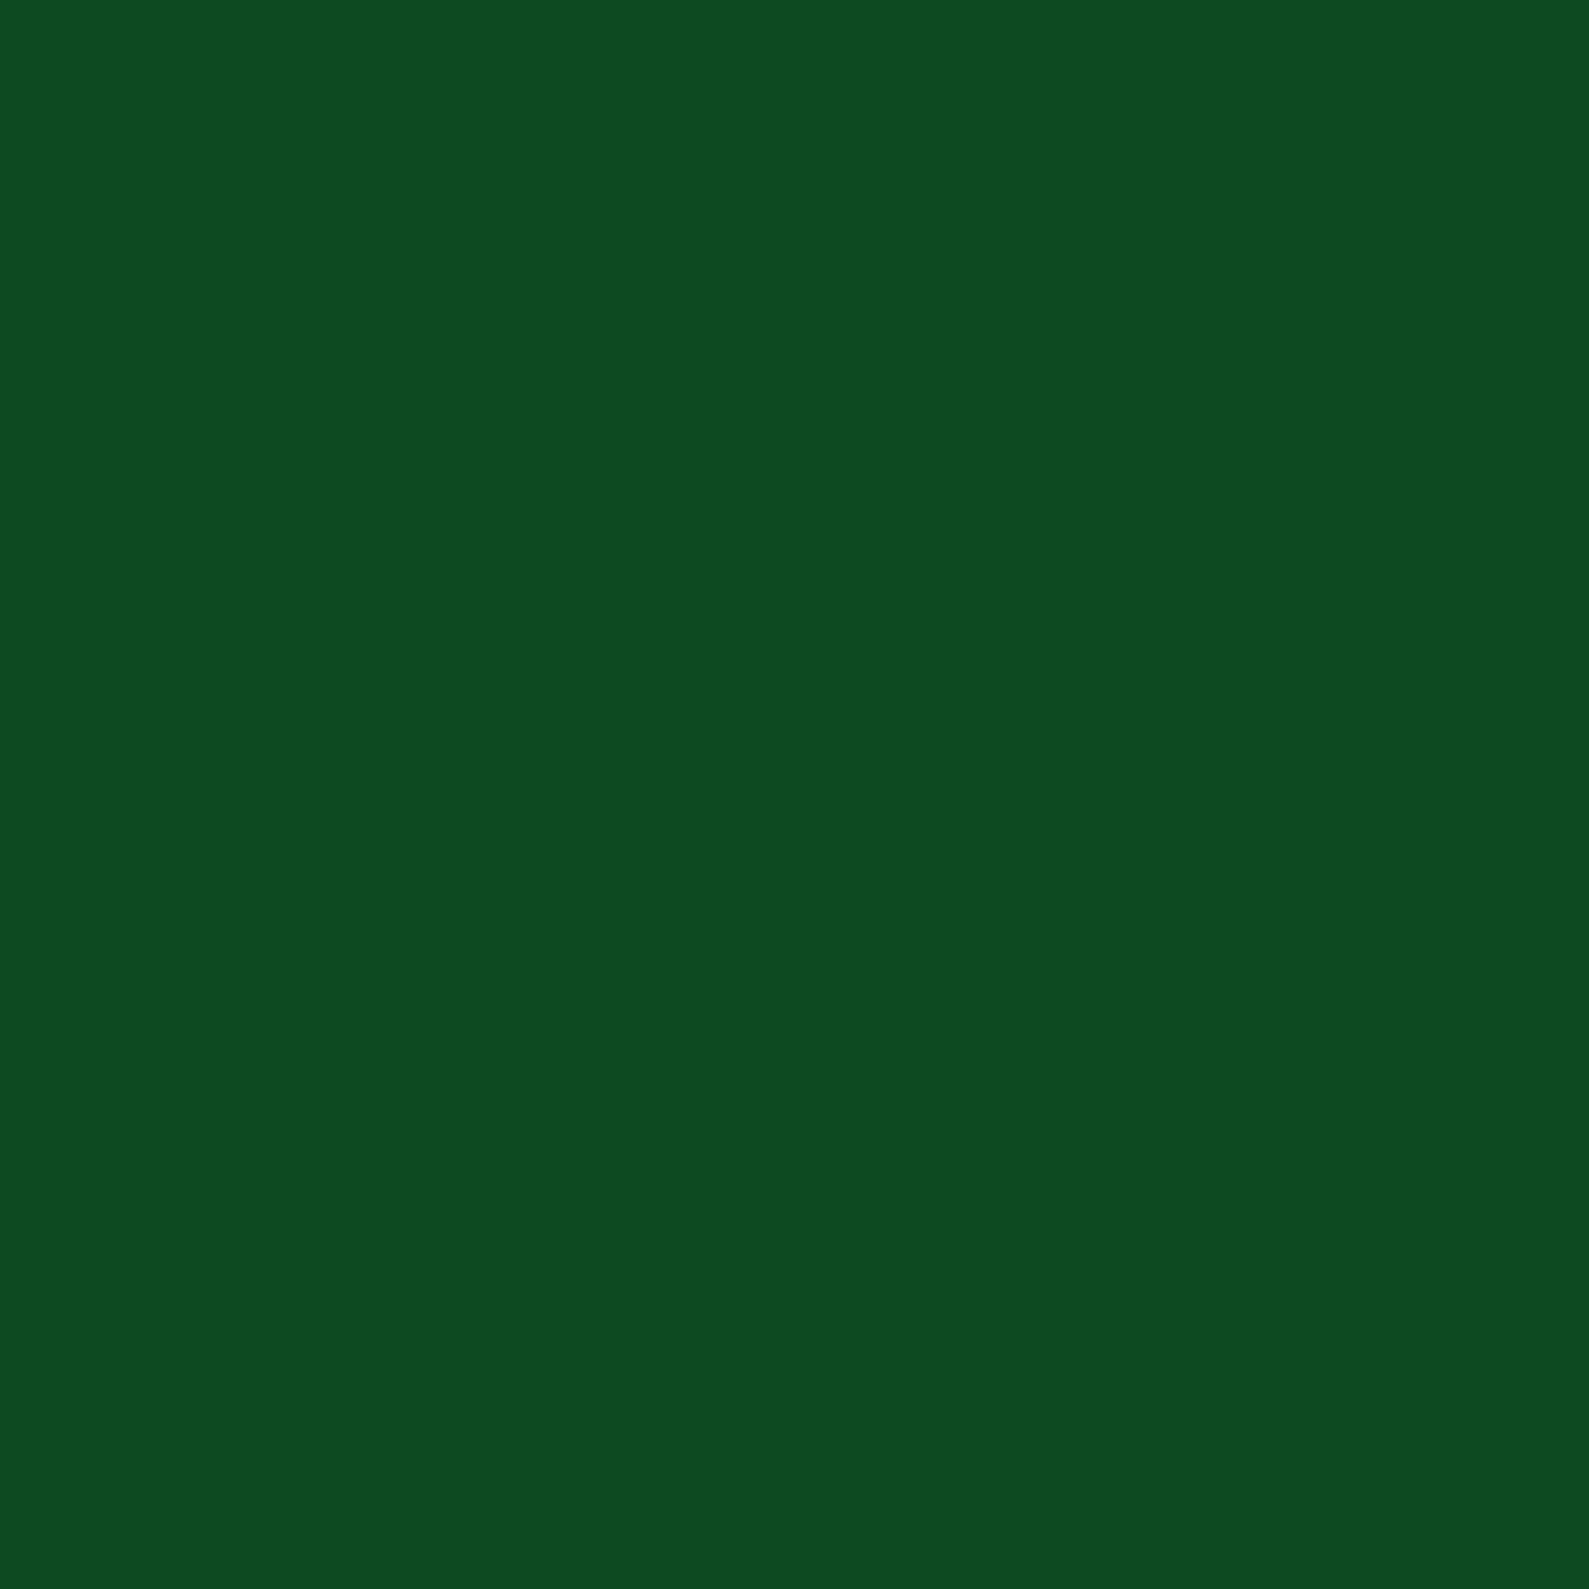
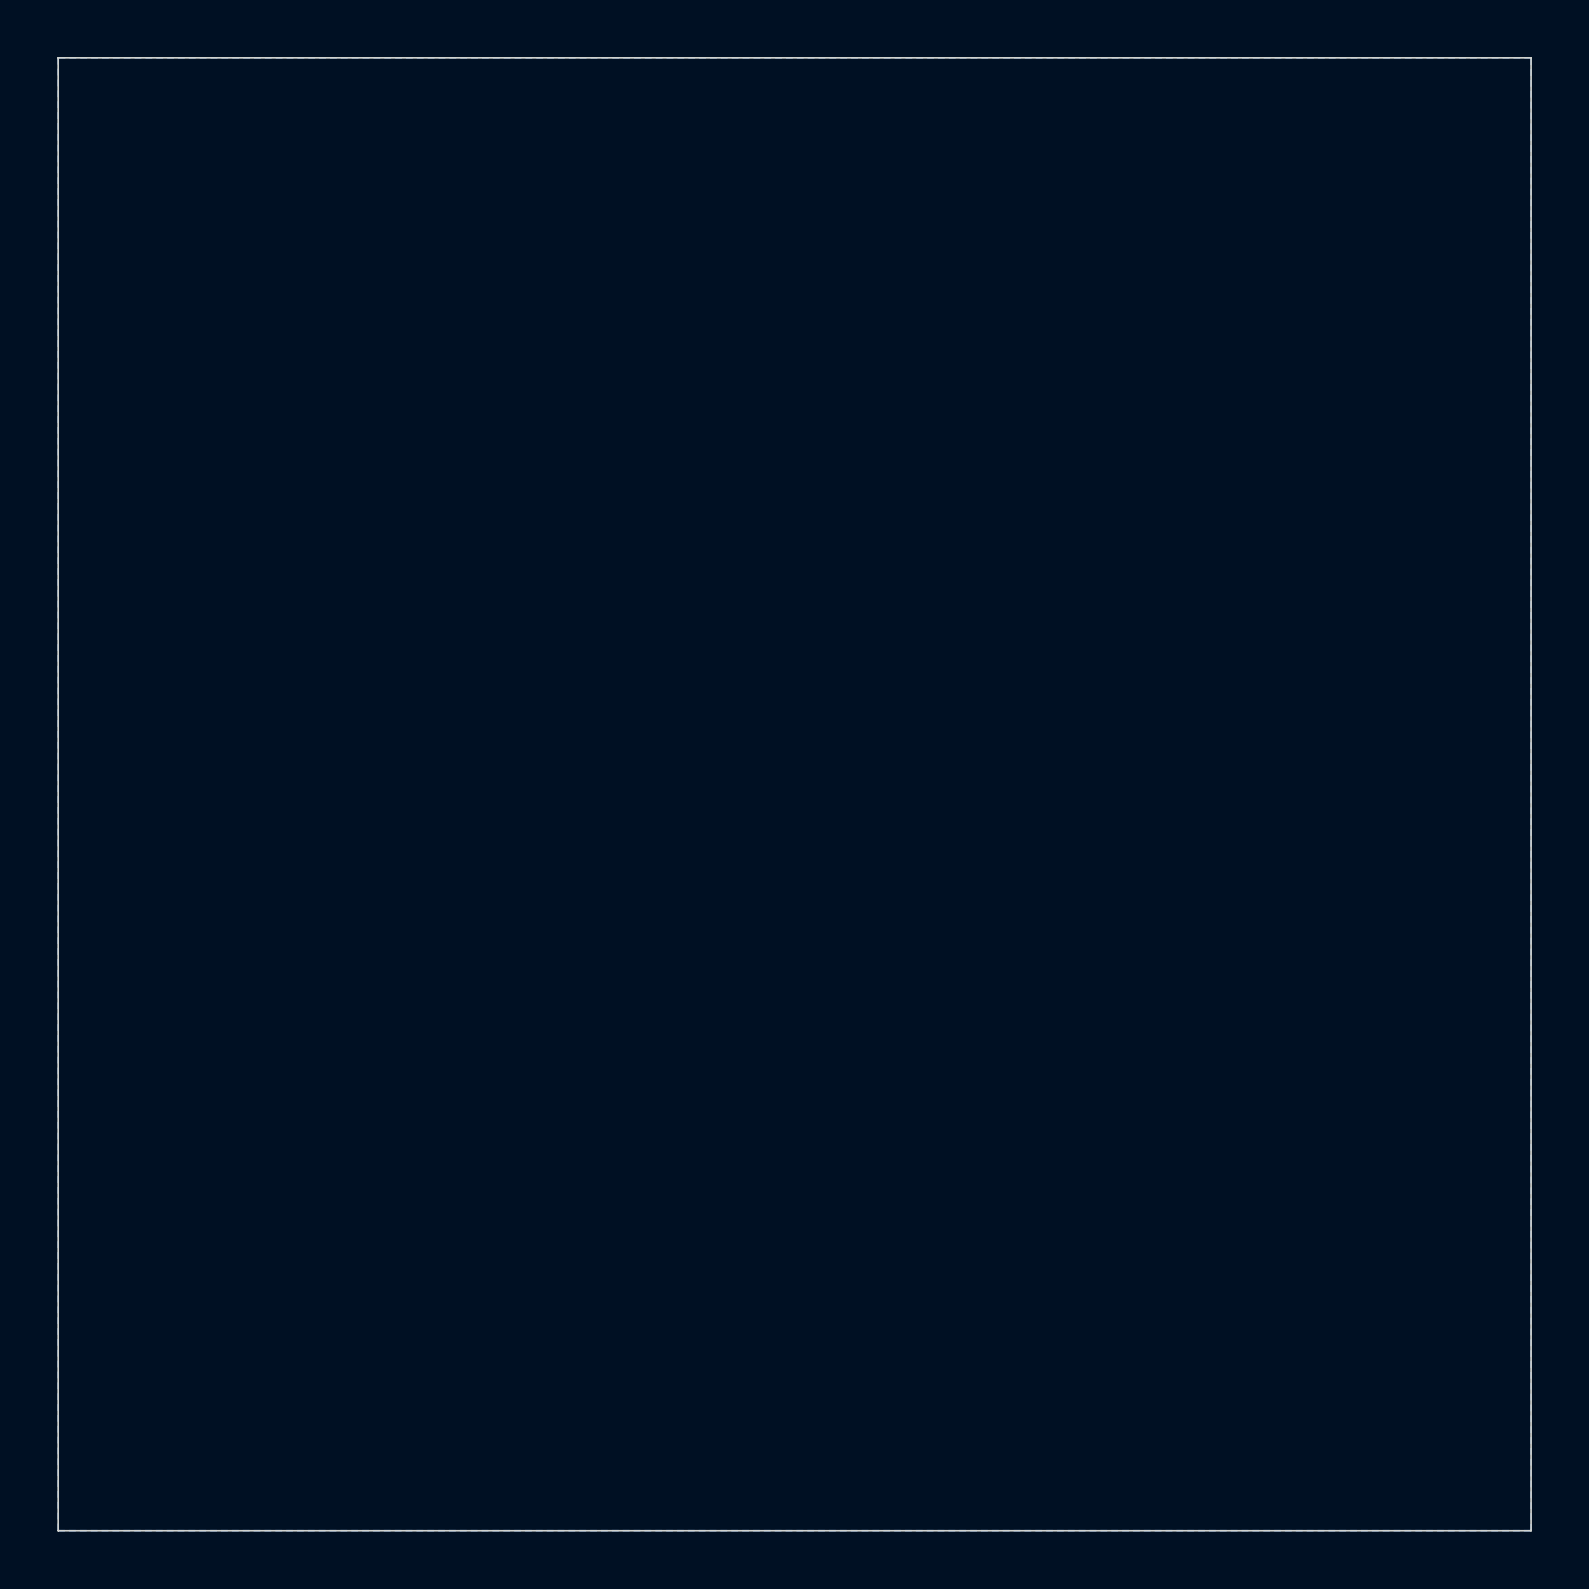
board edge: none -> (1531, 57) (58, 57) (58, 1530) (1531, 1530) (1531, 57)

